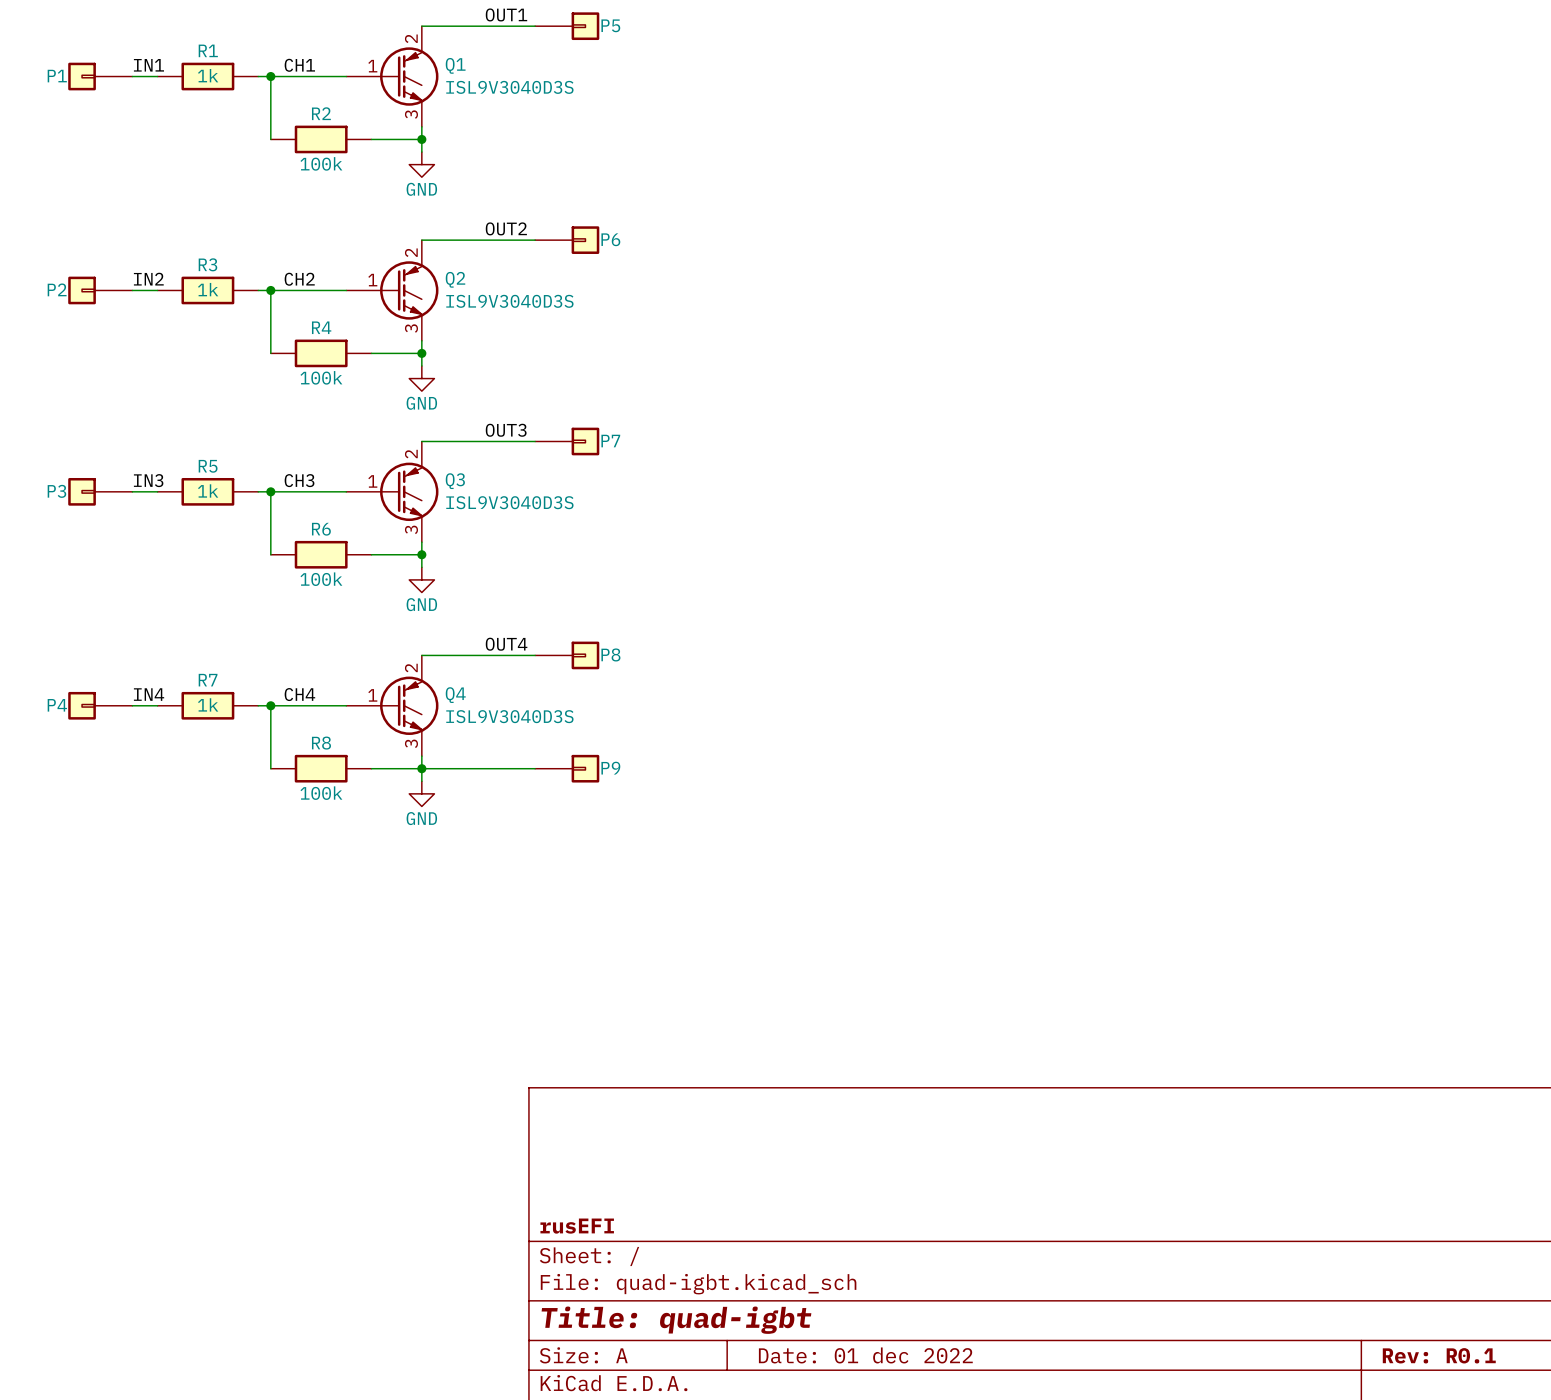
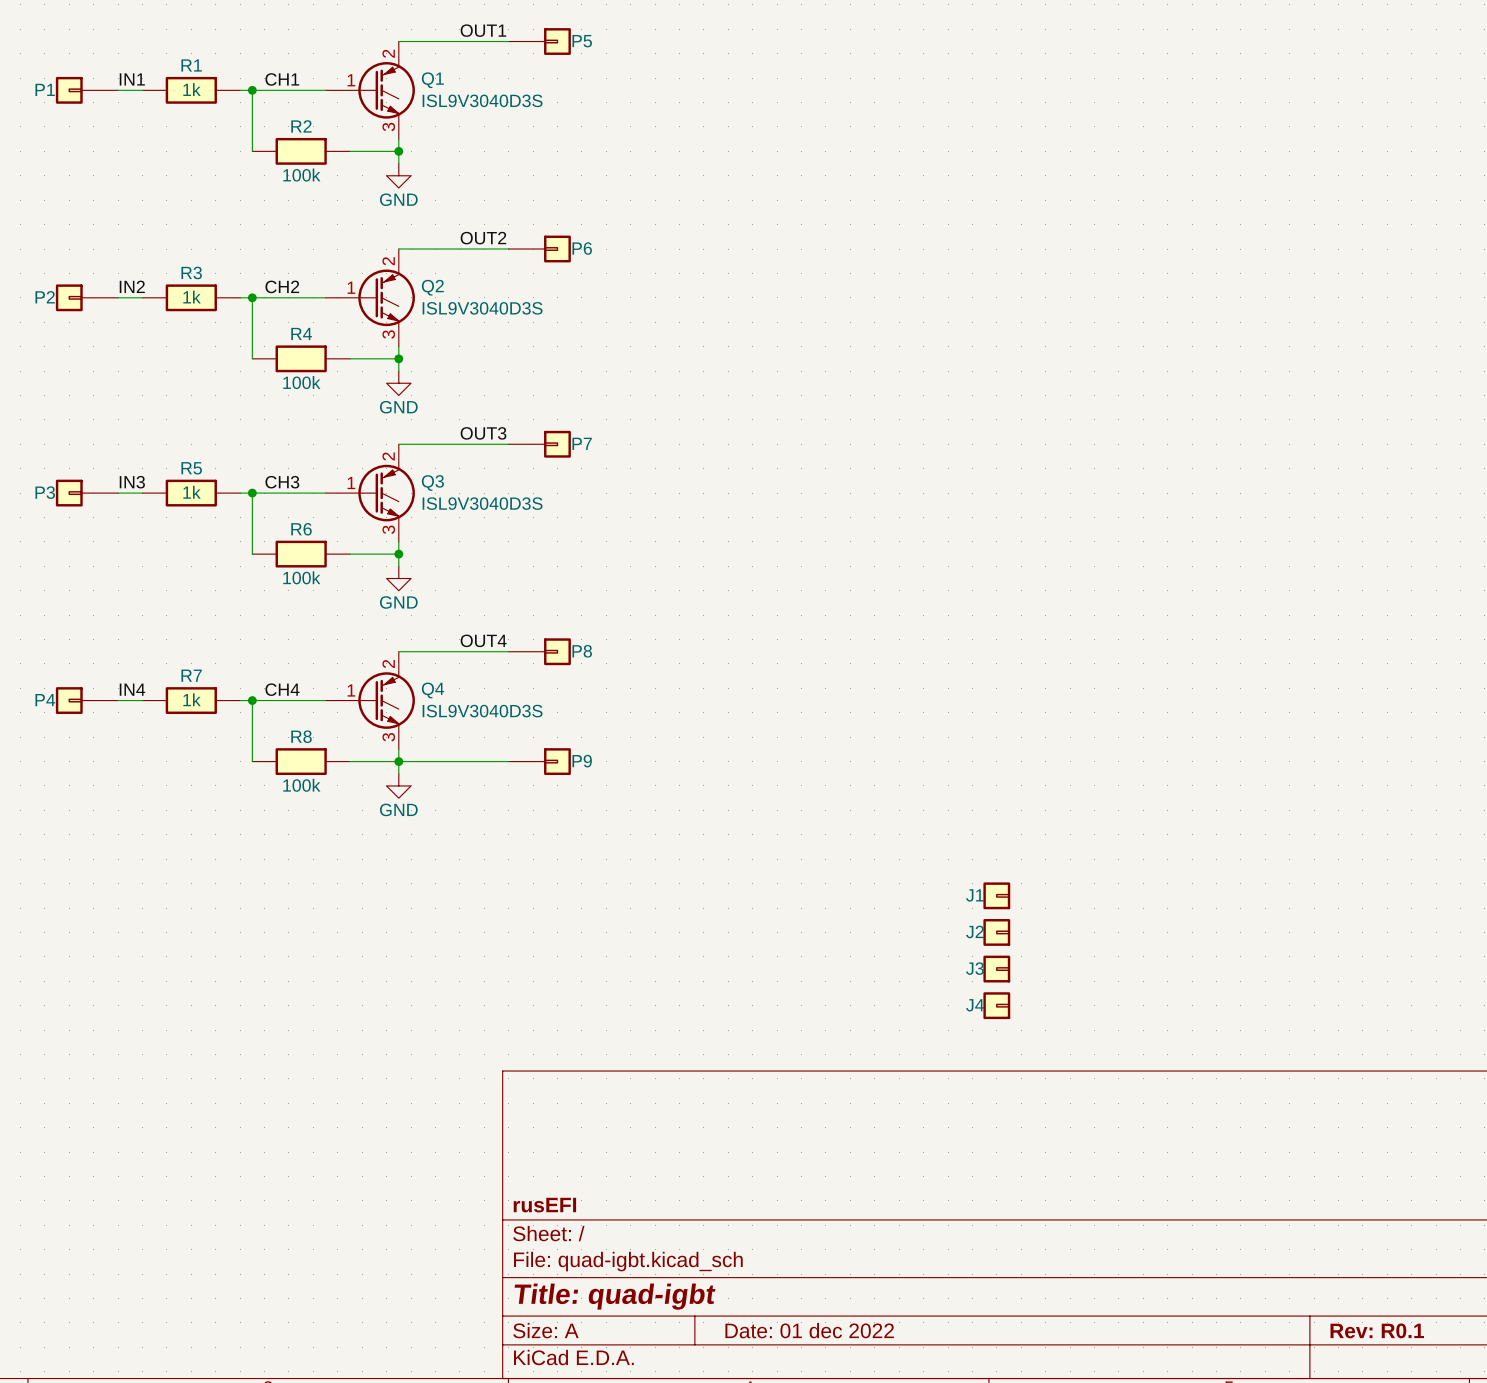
J1: none -> (996, 895)
J2: none -> (996, 932)
J3: none -> (996, 969)
J4: none -> (996, 1005)

